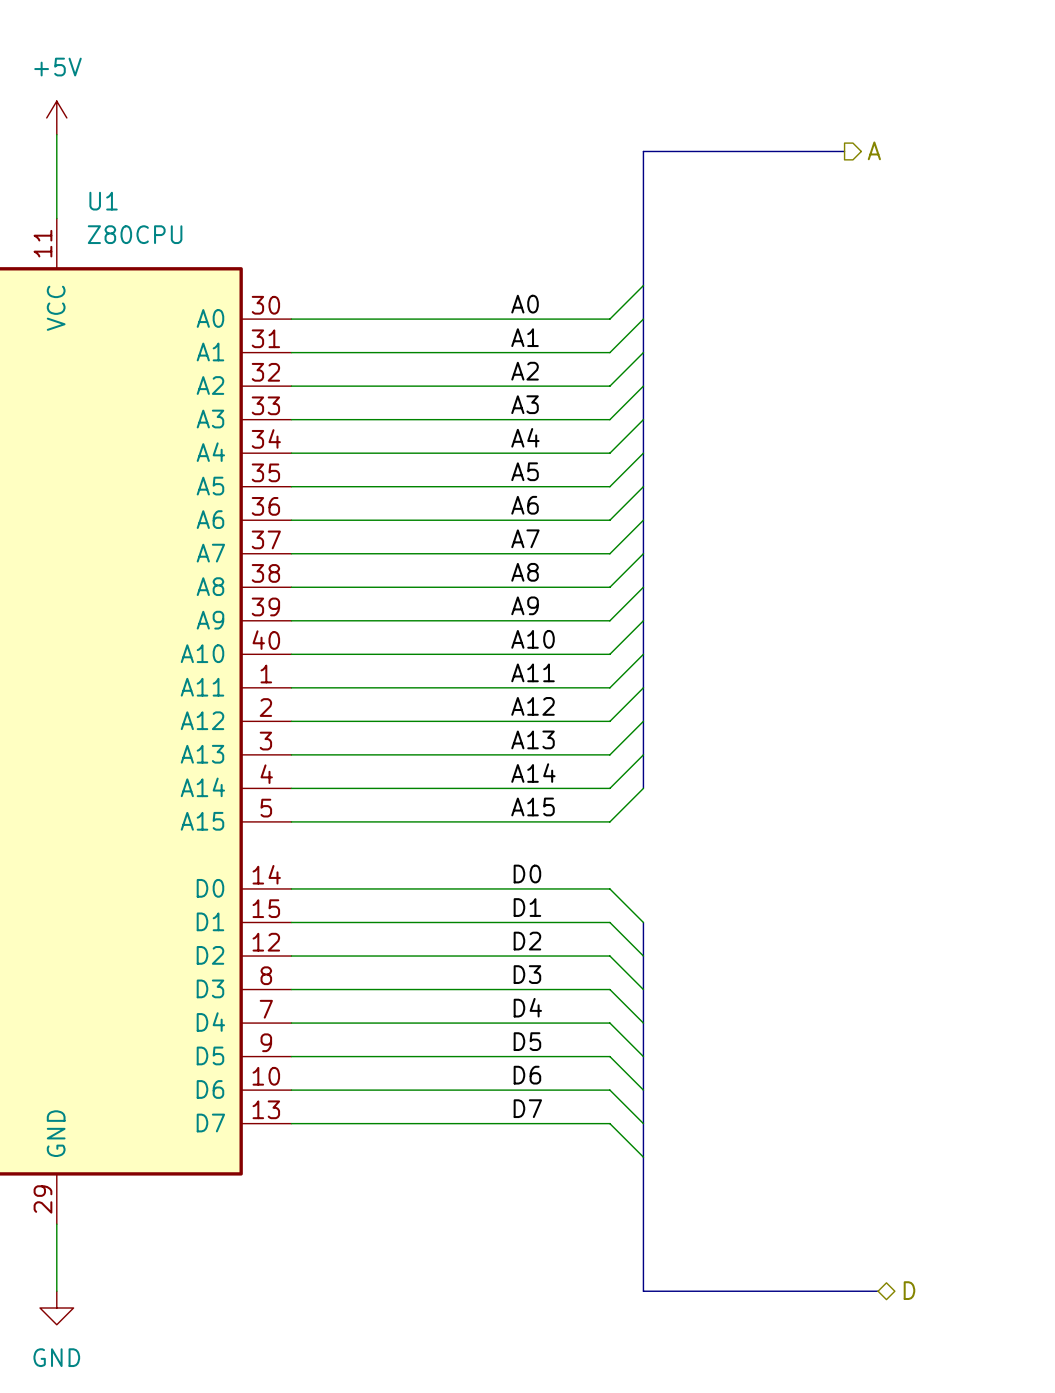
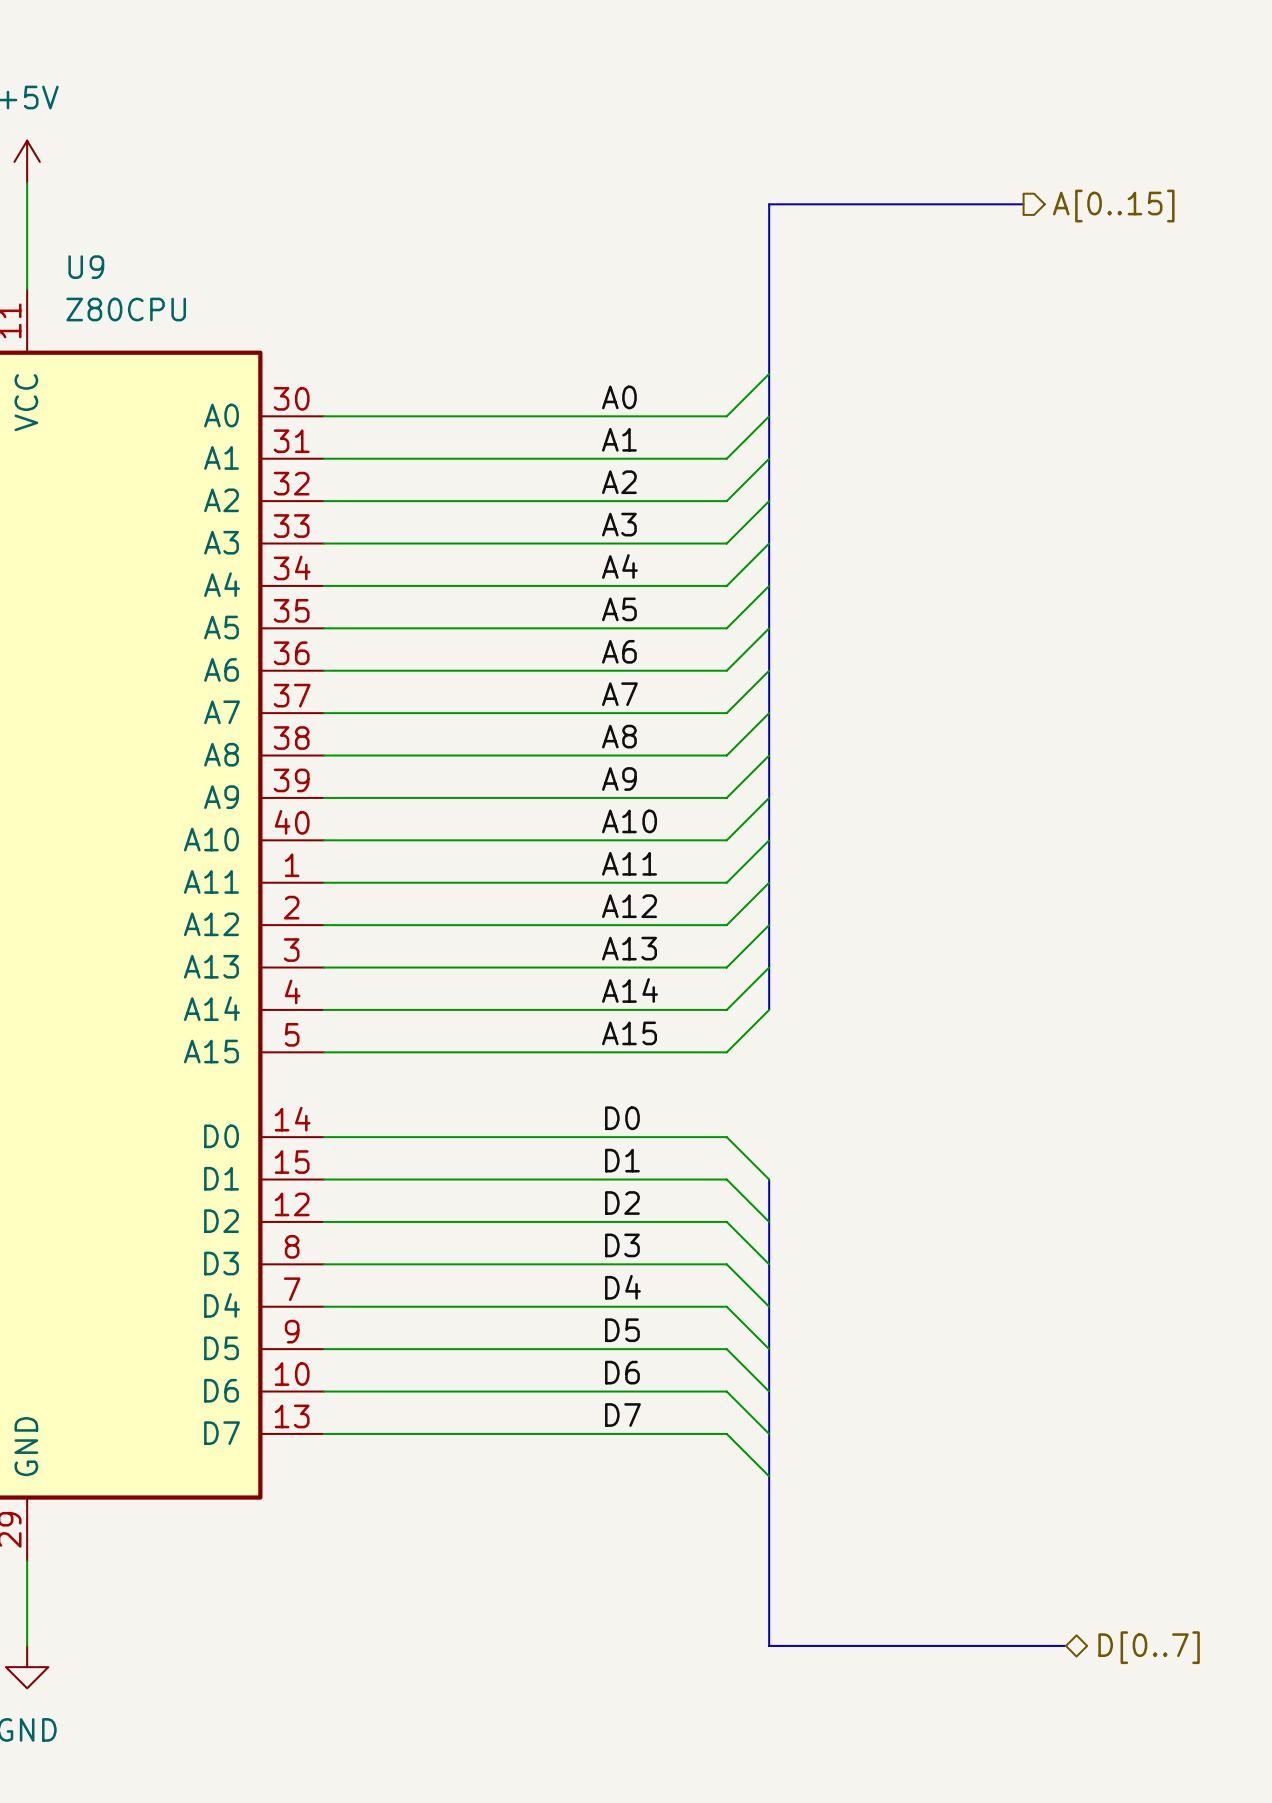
hierarchical label: A (874, 150) -> A[0..15] (1113, 206)
U1 name: U1 (103, 201) -> U9 (86, 267)
hierarchical label: D (909, 1290) -> D[0..7] (1149, 1647)

